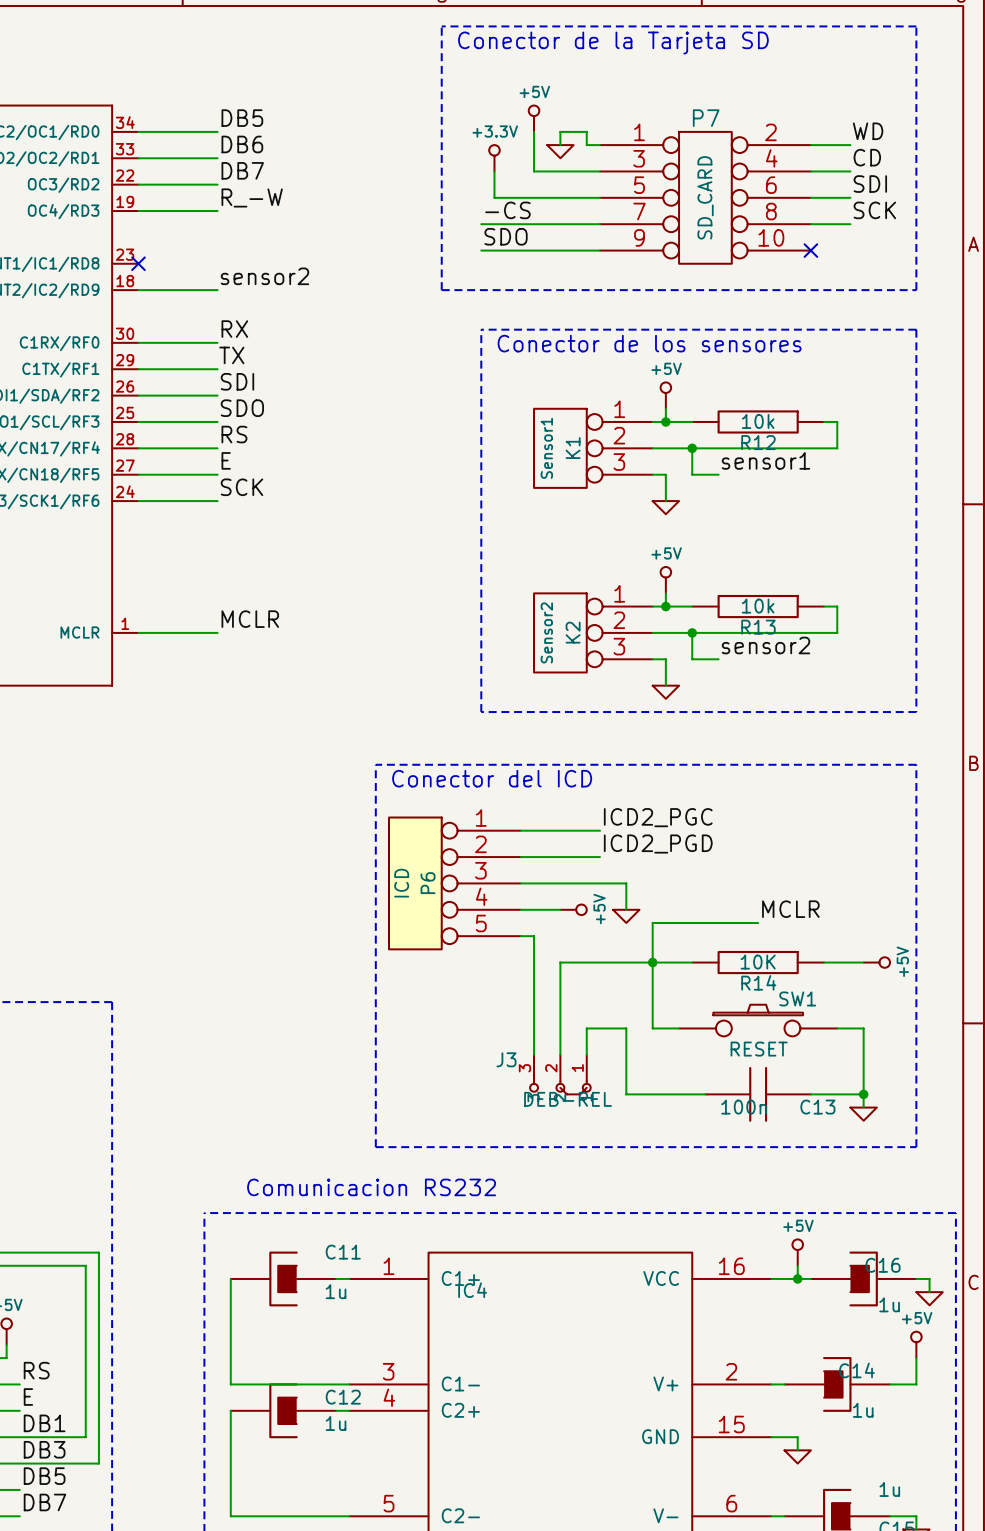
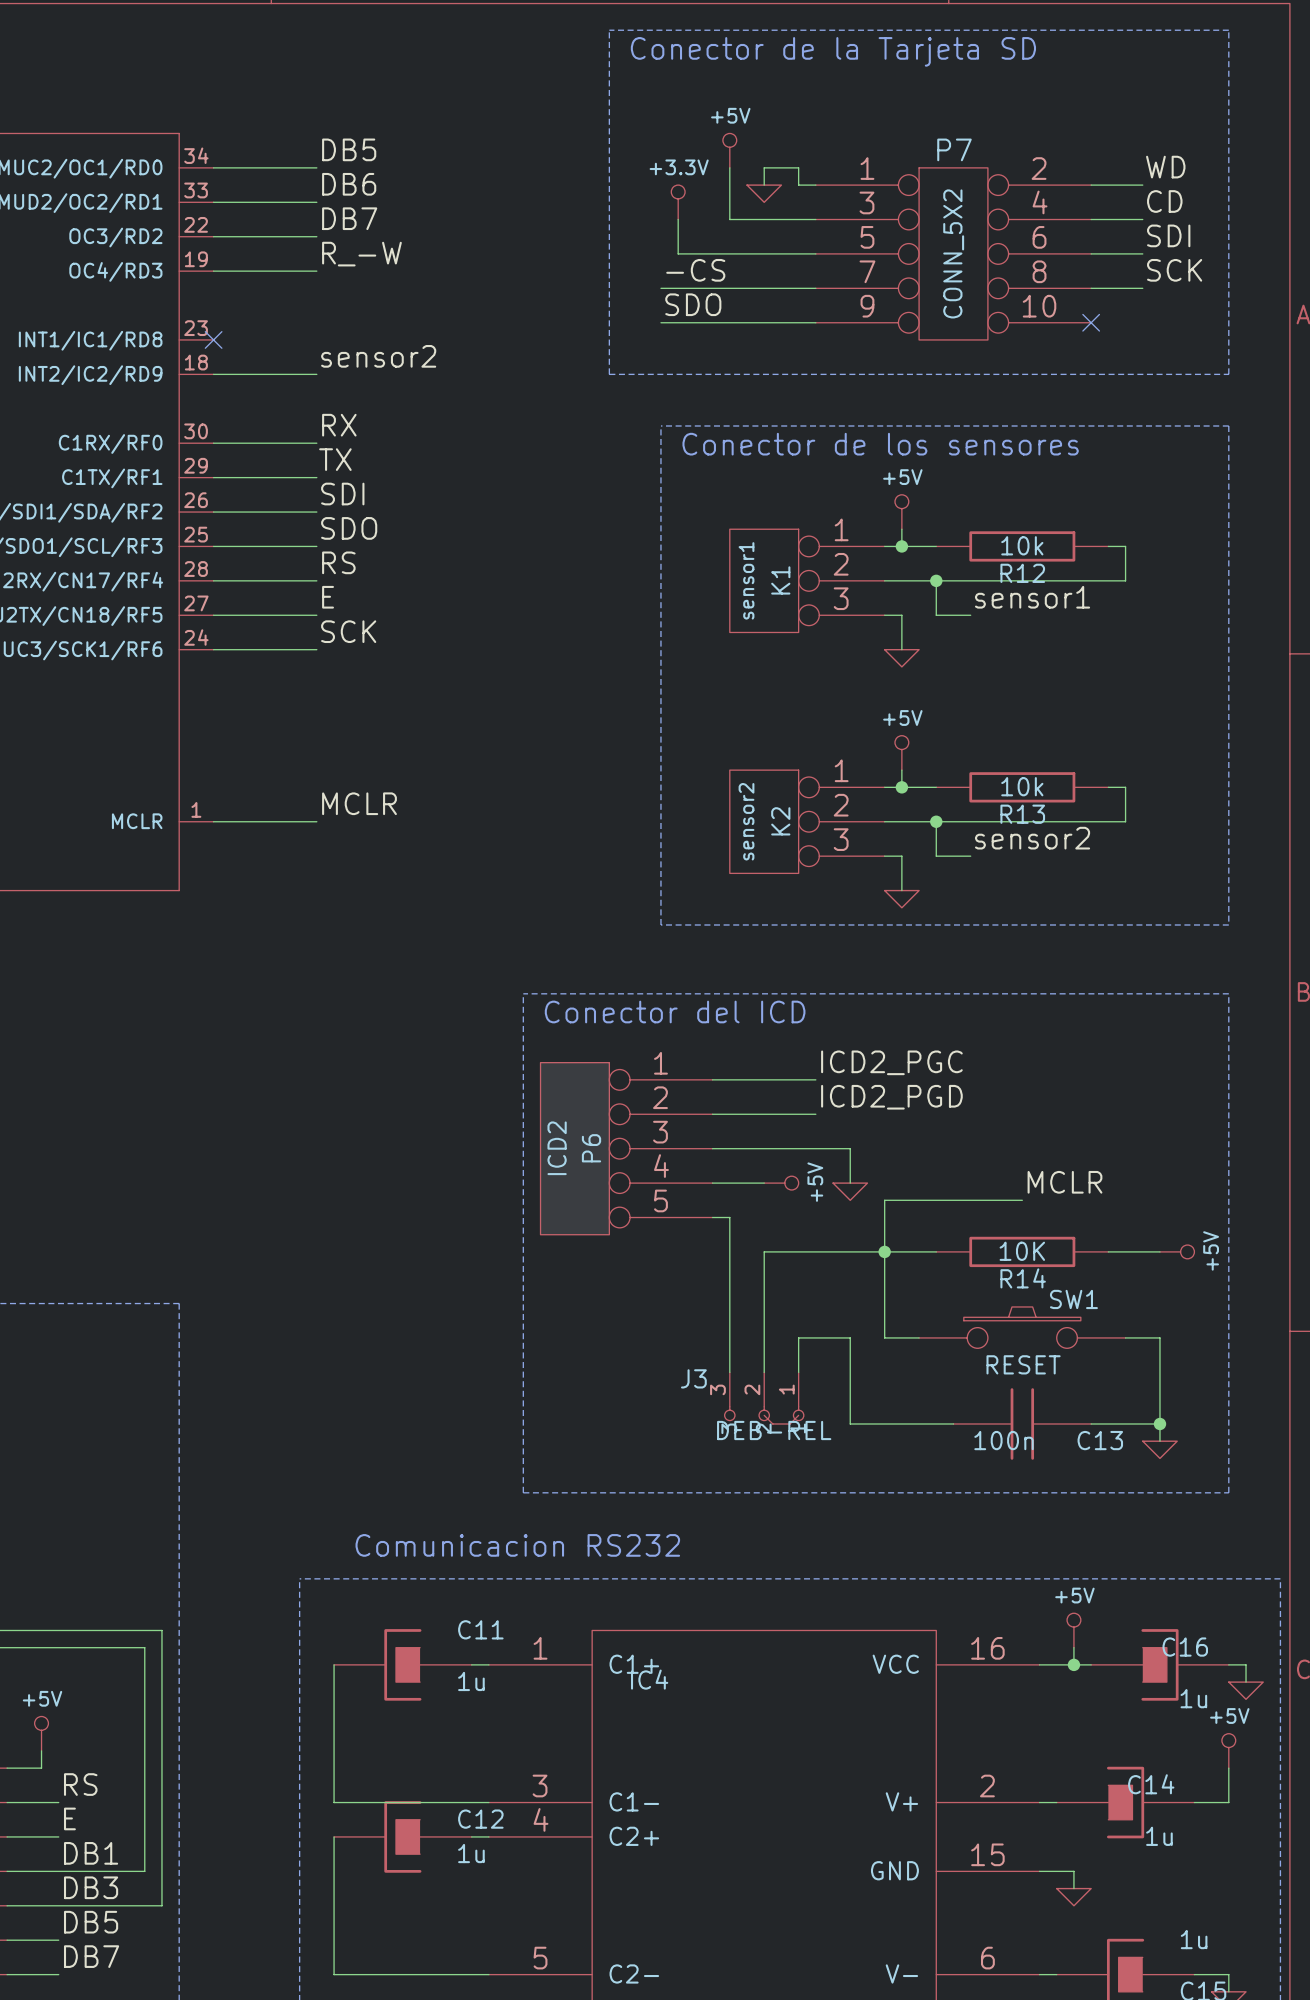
P7 value: SD_CARD (705, 197) -> CONN_5X2 (953, 253)
K1 value: Sensor1 (546, 448) -> sensor1 (746, 580)
K2 value: Sensor2 (546, 632) -> sensor2 (746, 821)
P6 value: ICD (401, 883) -> ICD2 (557, 1148)

